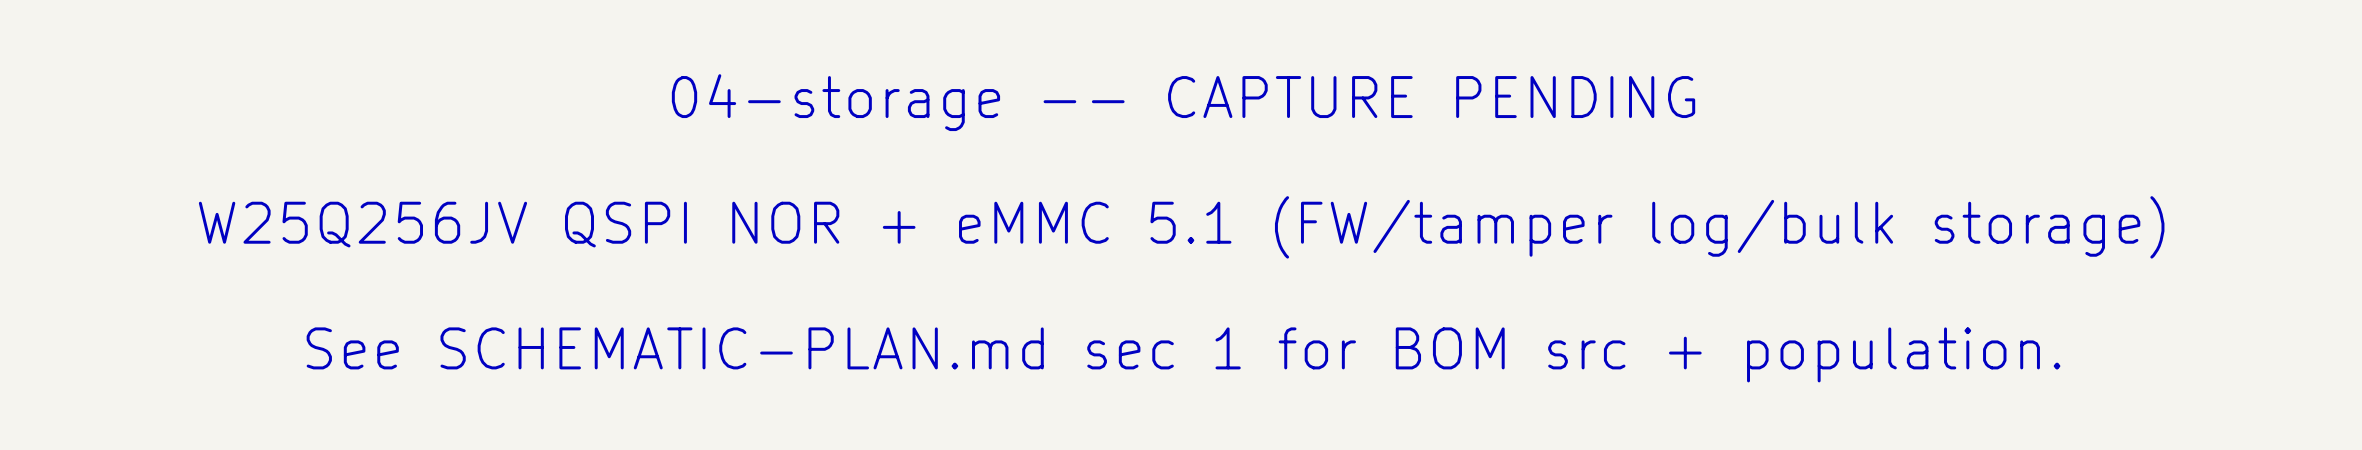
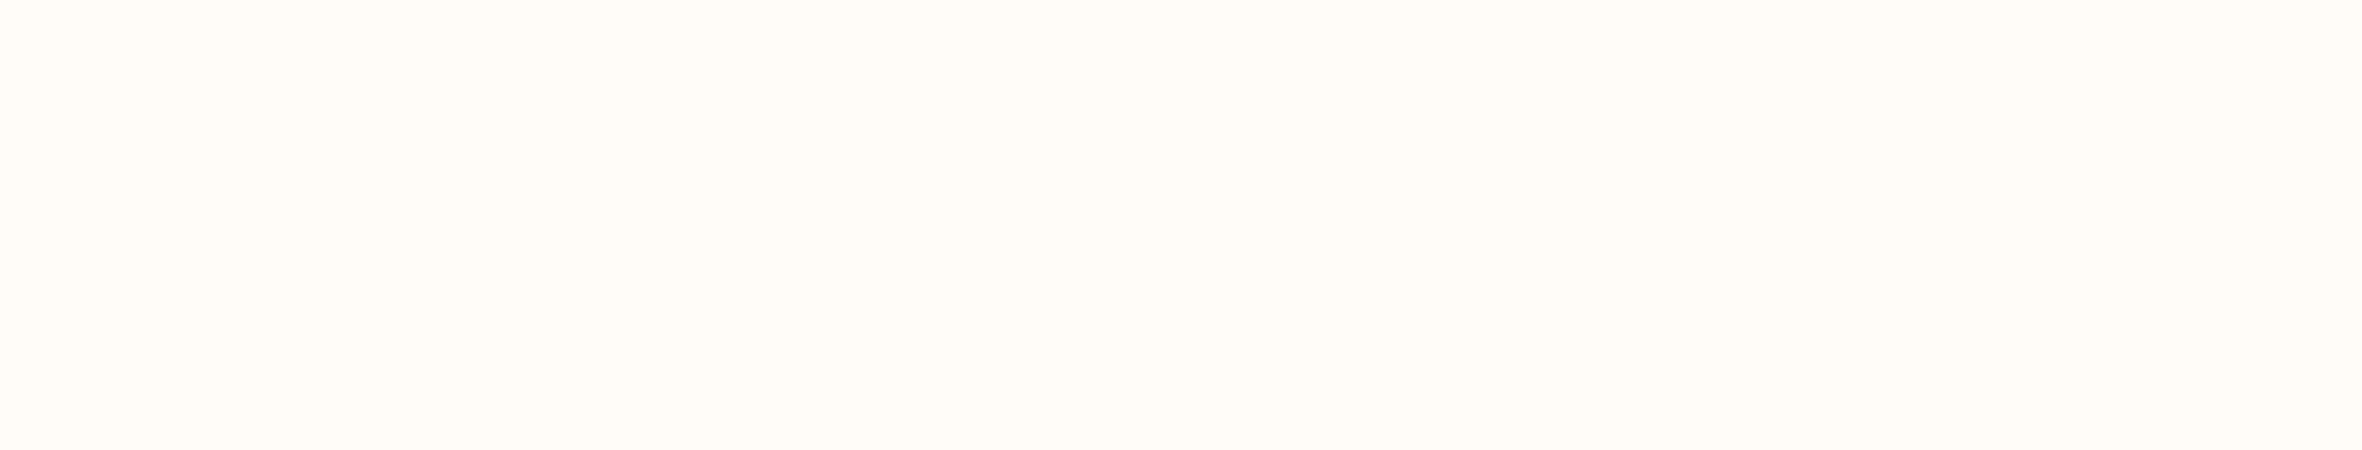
text: 04-storage -- CAPTURE PENDING (1183, 102) -> none
text: W25Q256JV QSPI NOR + eMMC 5.1 (FW/tamper log/bulk storage) (1181, 227) -> none
text: See SCHEMATIC-PLAN.md sec 1 for BOM src + population. (1183, 354) -> none

